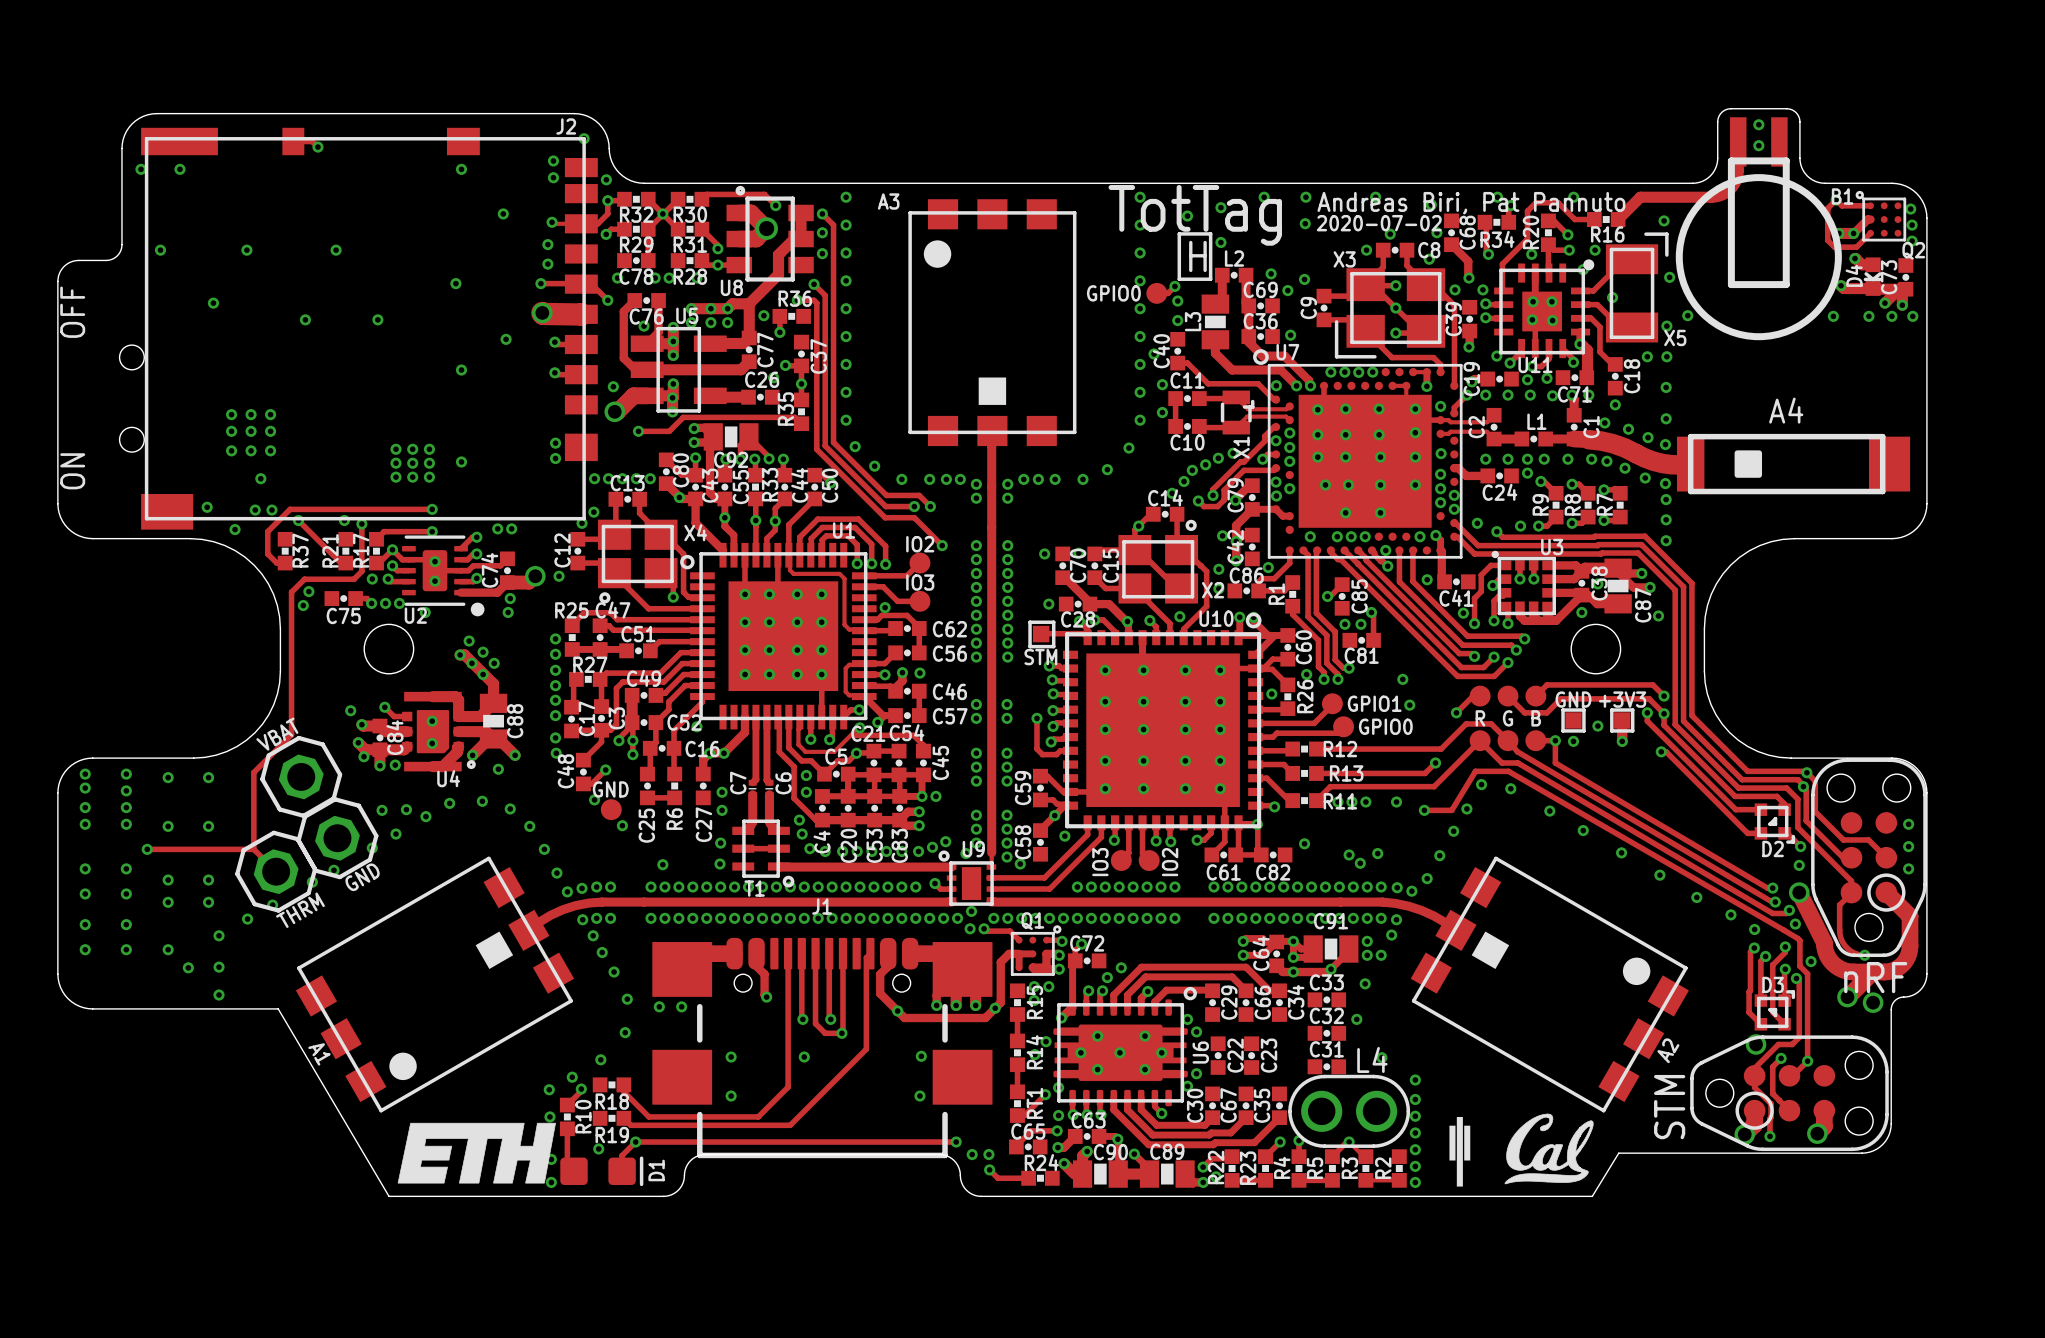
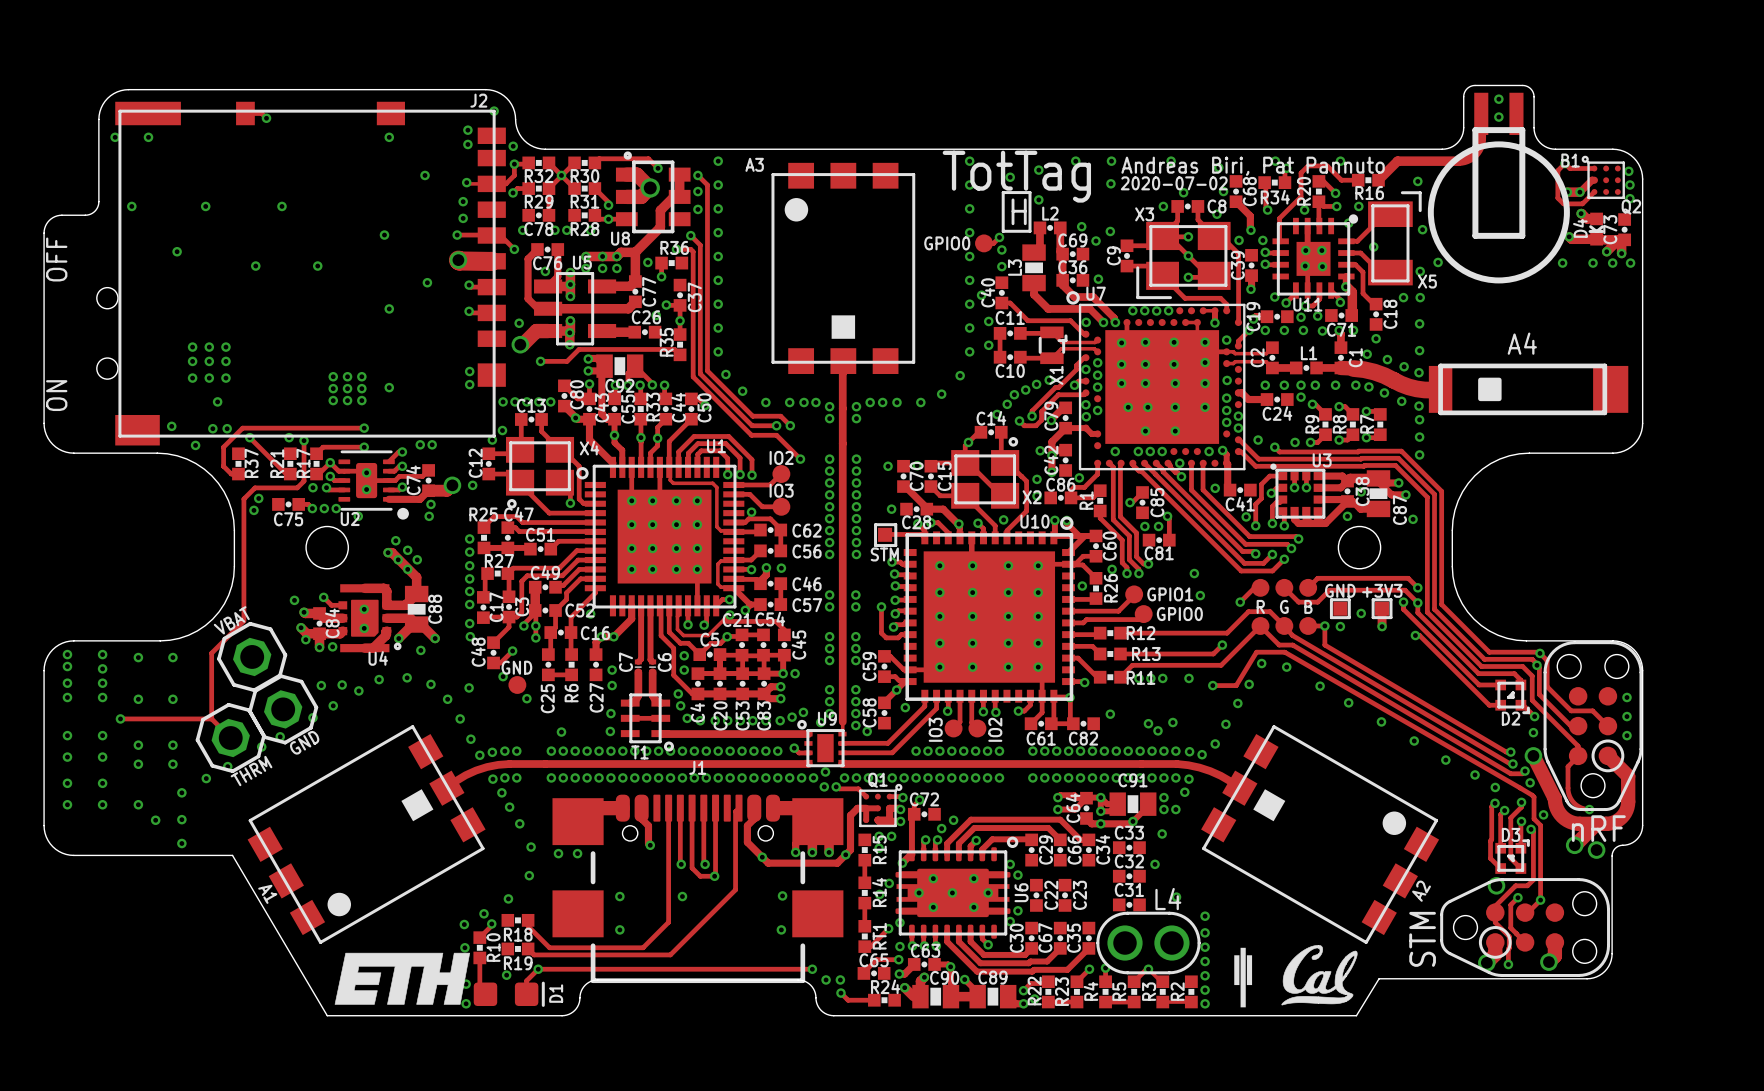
via: none -> (469, 687)

